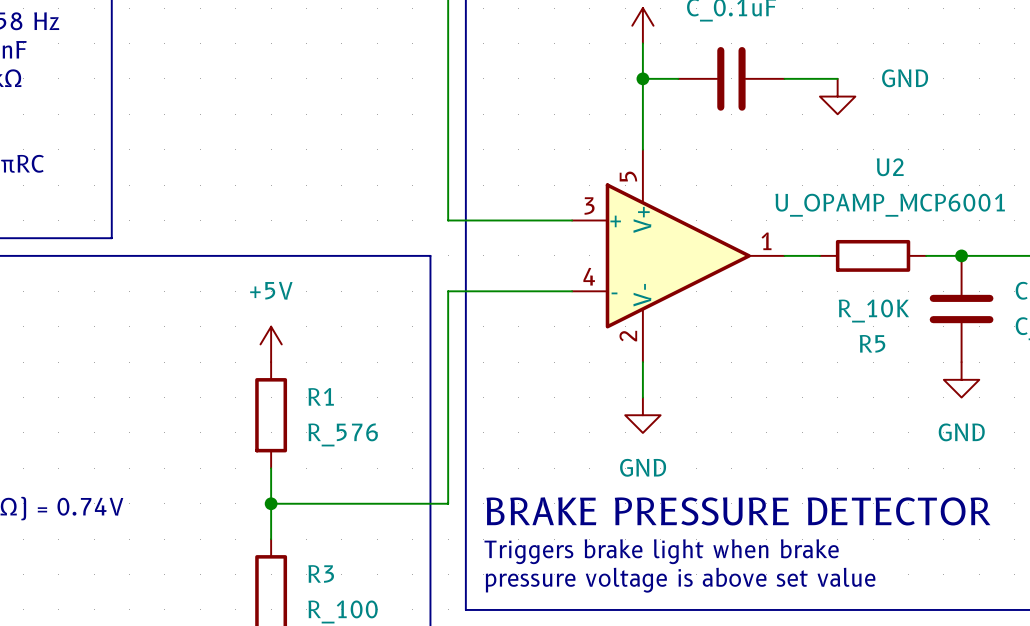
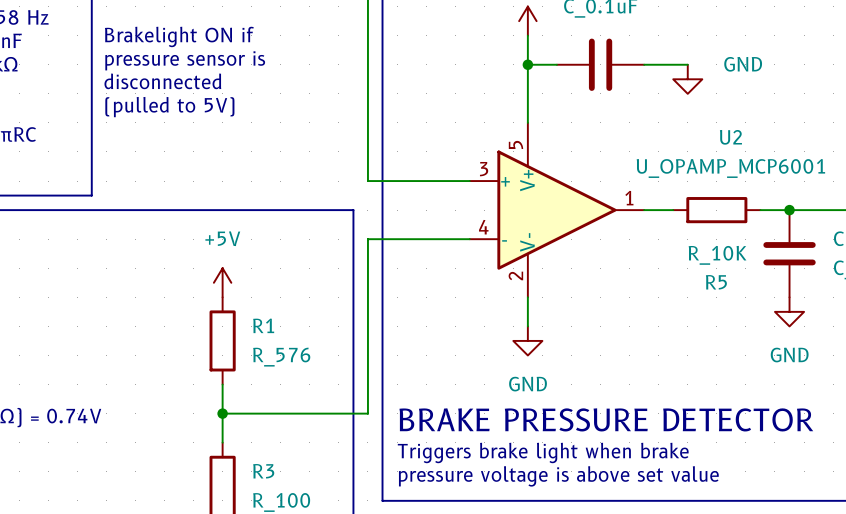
text: none -> Brakelight ON if (179, 36)
text: none -> pressure sensor is (185, 60)
text: none -> disconnected (162, 81)
text: none -> (pulled to 5V) (169, 107)

